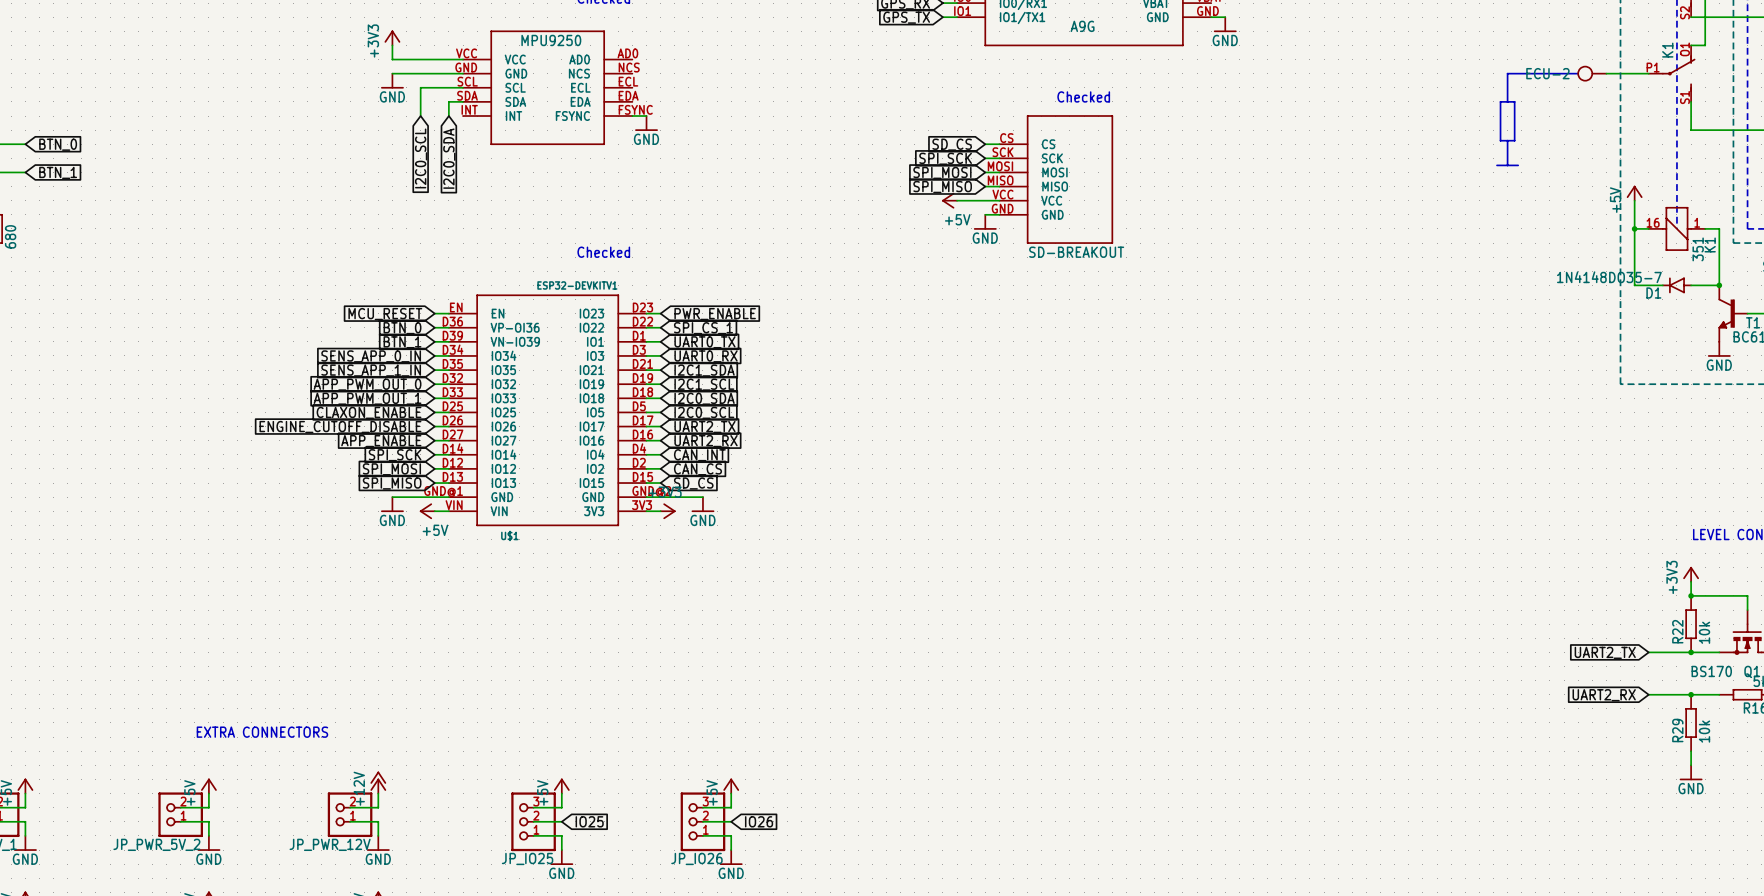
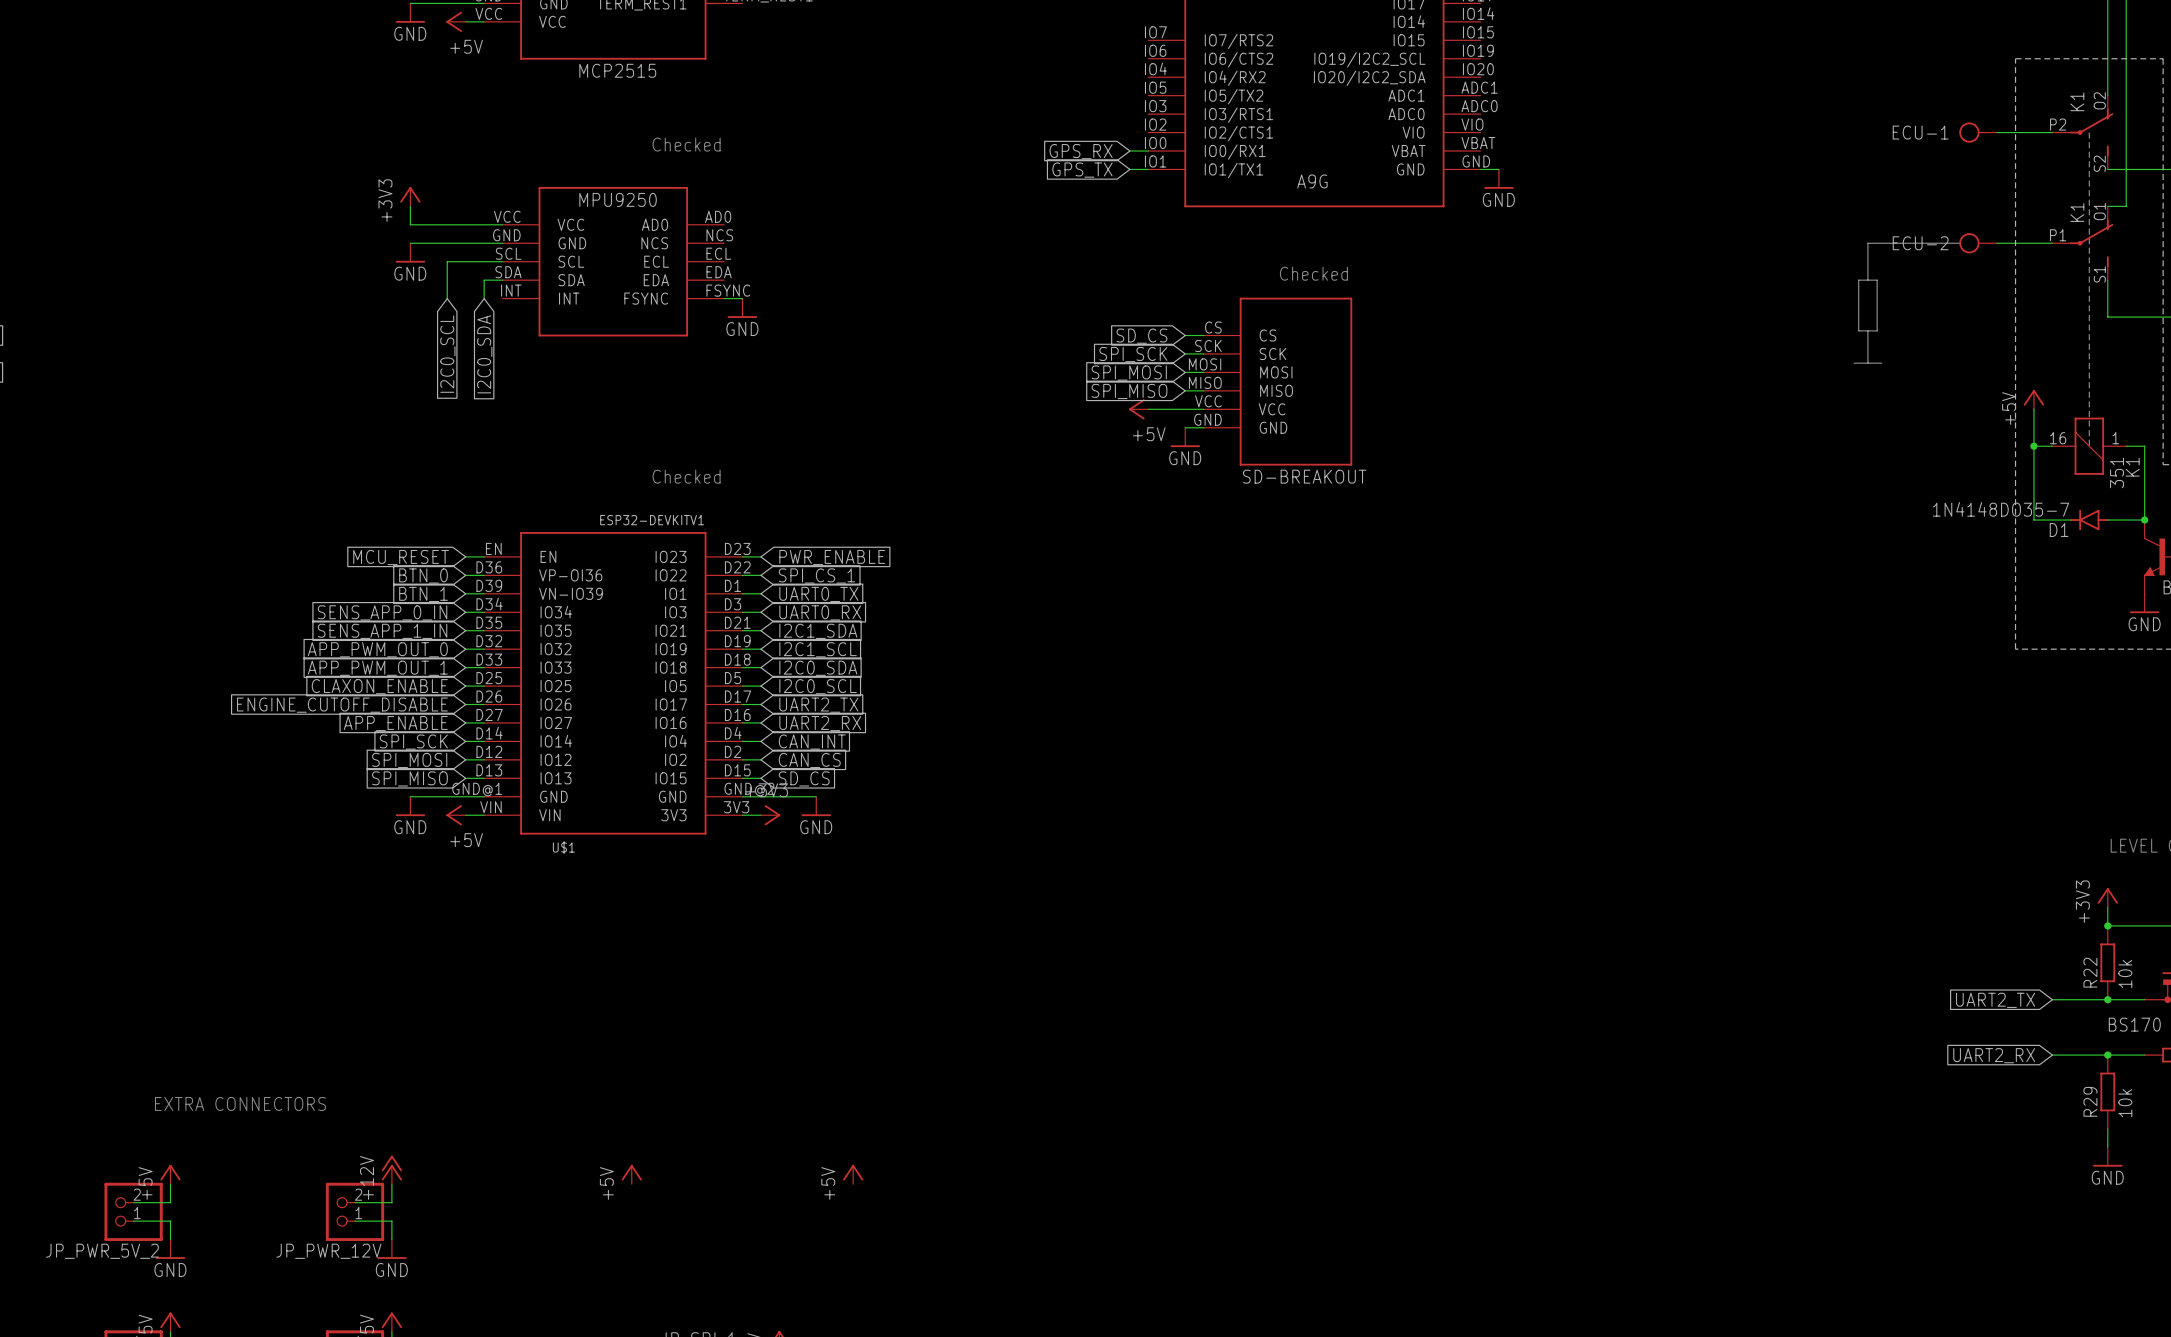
wire: (561, 793) (561, 807) (533, 807) -> none
wire: (731, 793) (731, 807) (702, 807) -> none
wire: (533, 821) (561, 821) -> none
JP_IO25: (533, 821) -> none
global label: IO25 (589, 821) -> none
wire: (702, 821) (731, 821) -> none
JP_IO26: (702, 821) -> none
global label: IO26 (759, 821) -> none
wire: (533, 835) (561, 835) (561, 850) -> none
wire: (702, 835) (731, 835) (731, 850) -> none
power symbol: GND (561, 857) -> none
power symbol: GND (731, 857) -> none

